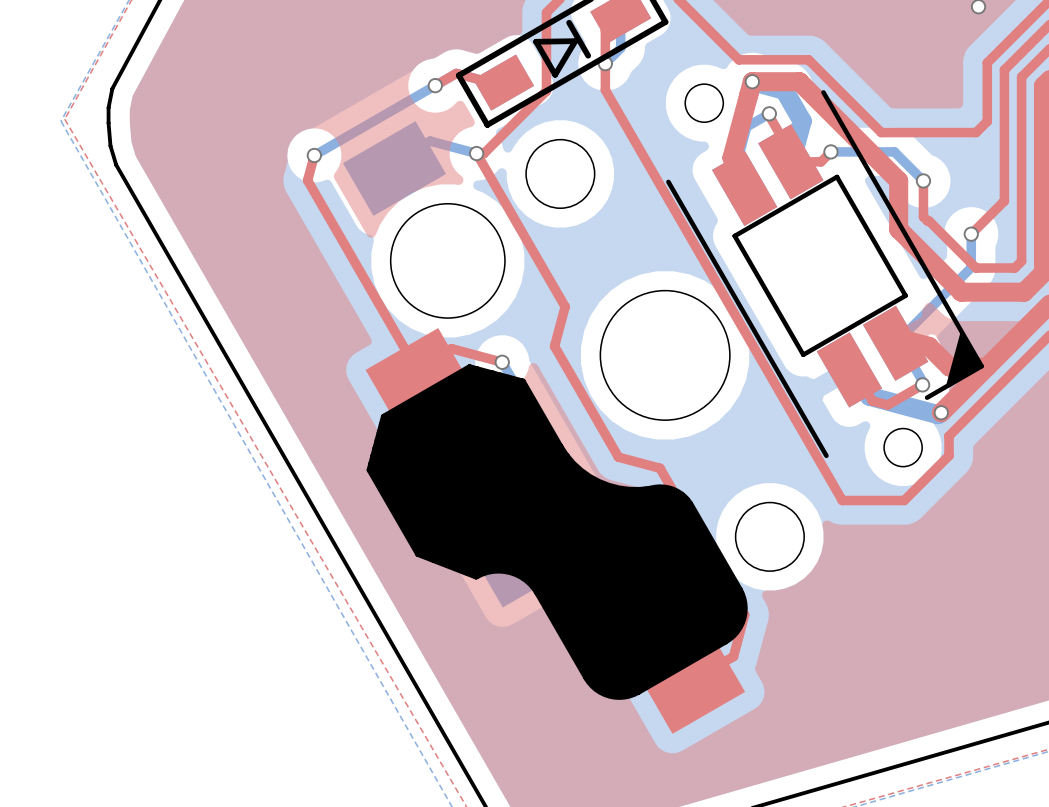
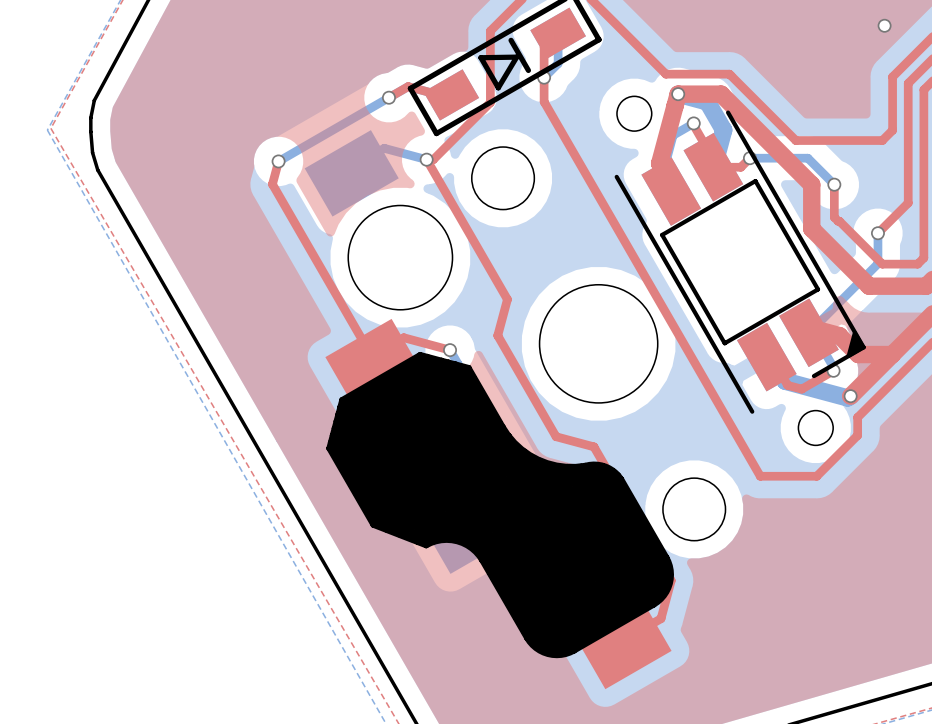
part footprint: [342, 84, 984, 734] -> [304, 96, 866, 690]

